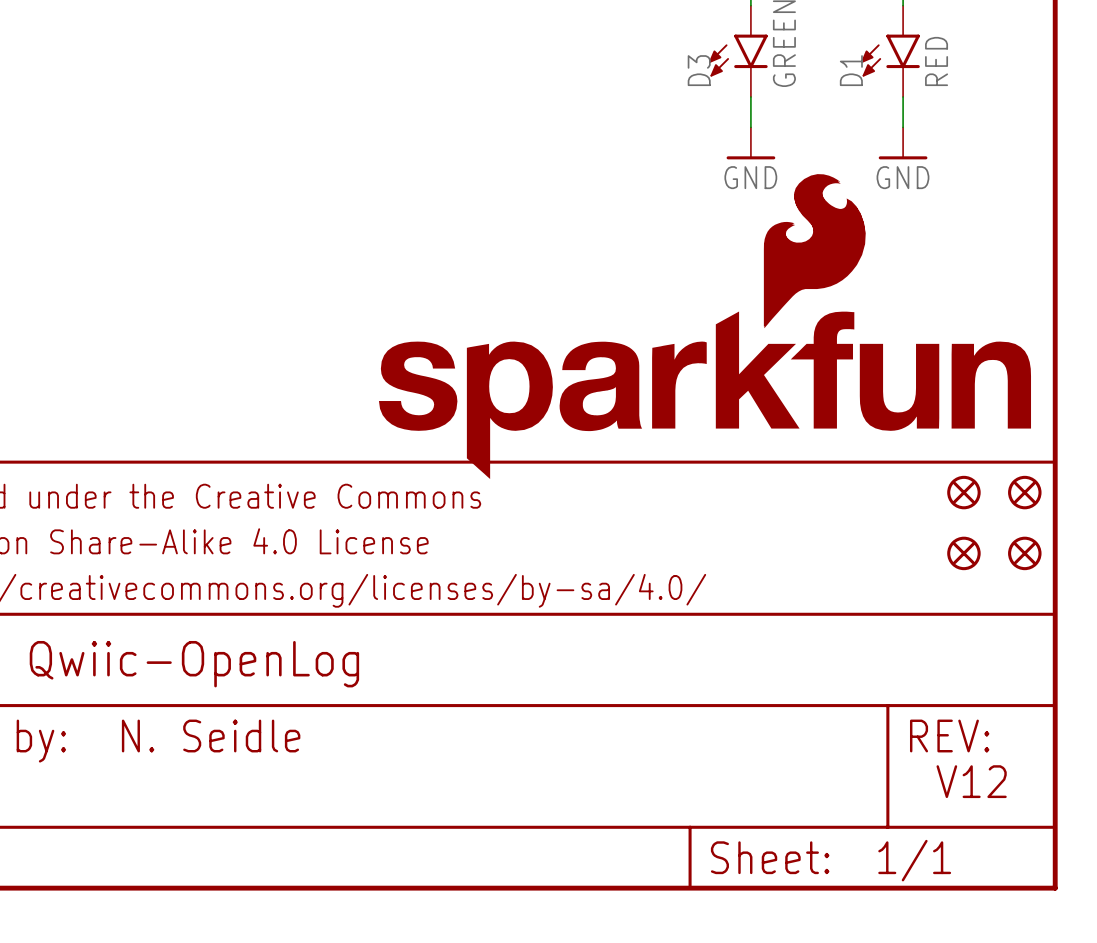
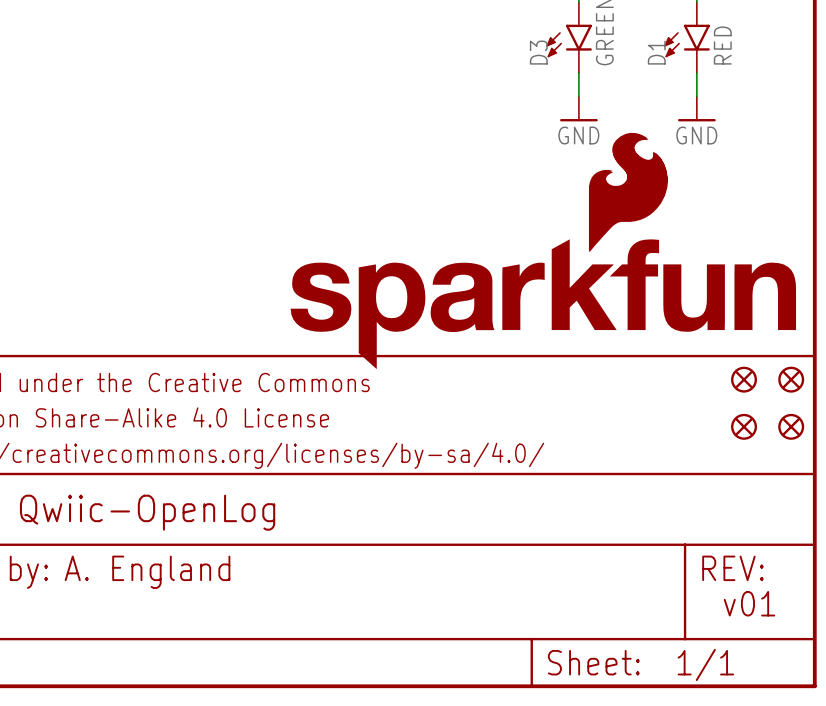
text: N. Seidle (211, 736) -> none
text: none -> A. England (147, 572)
text: V12 (971, 781) -> v01 (749, 603)

